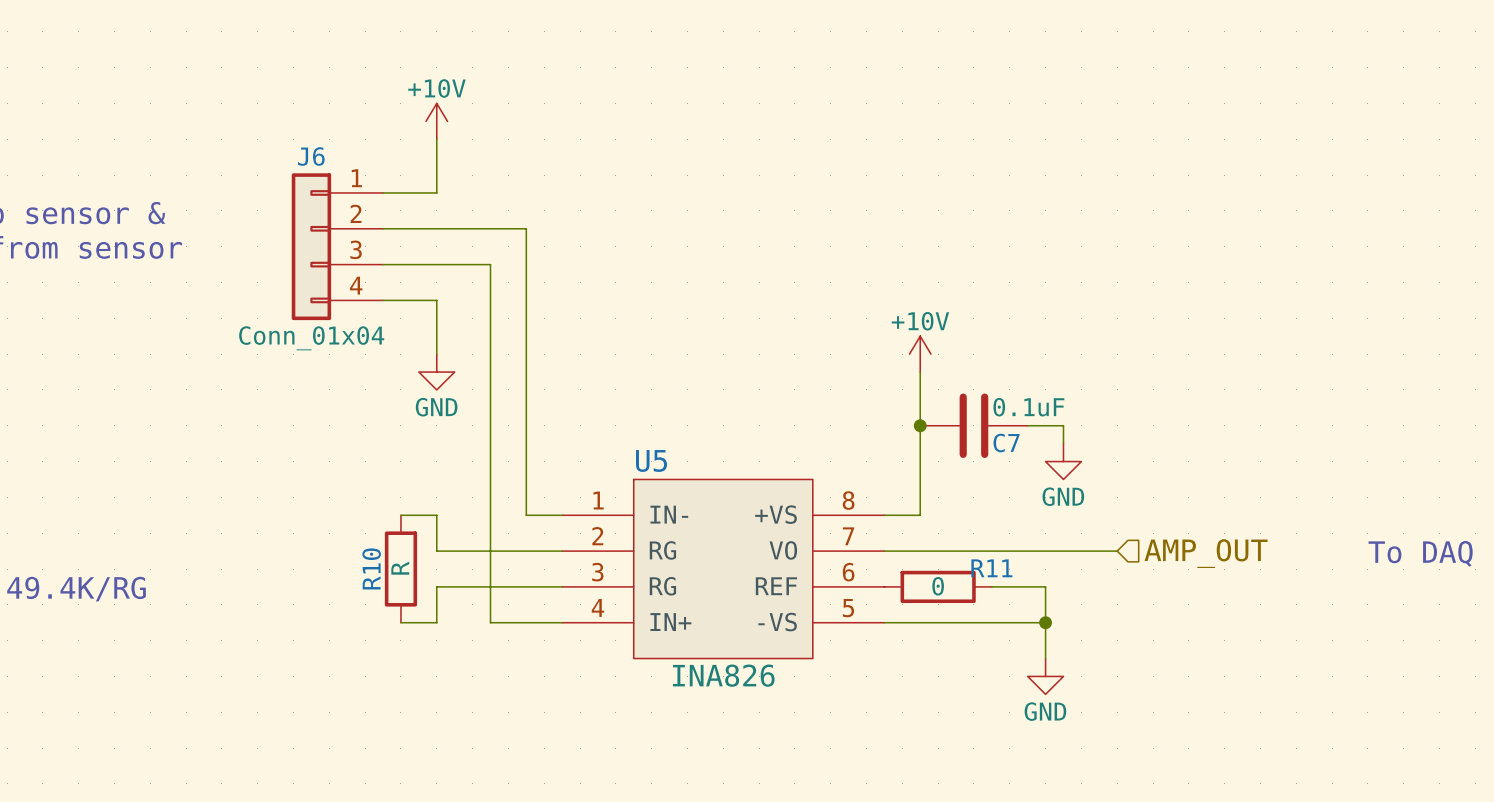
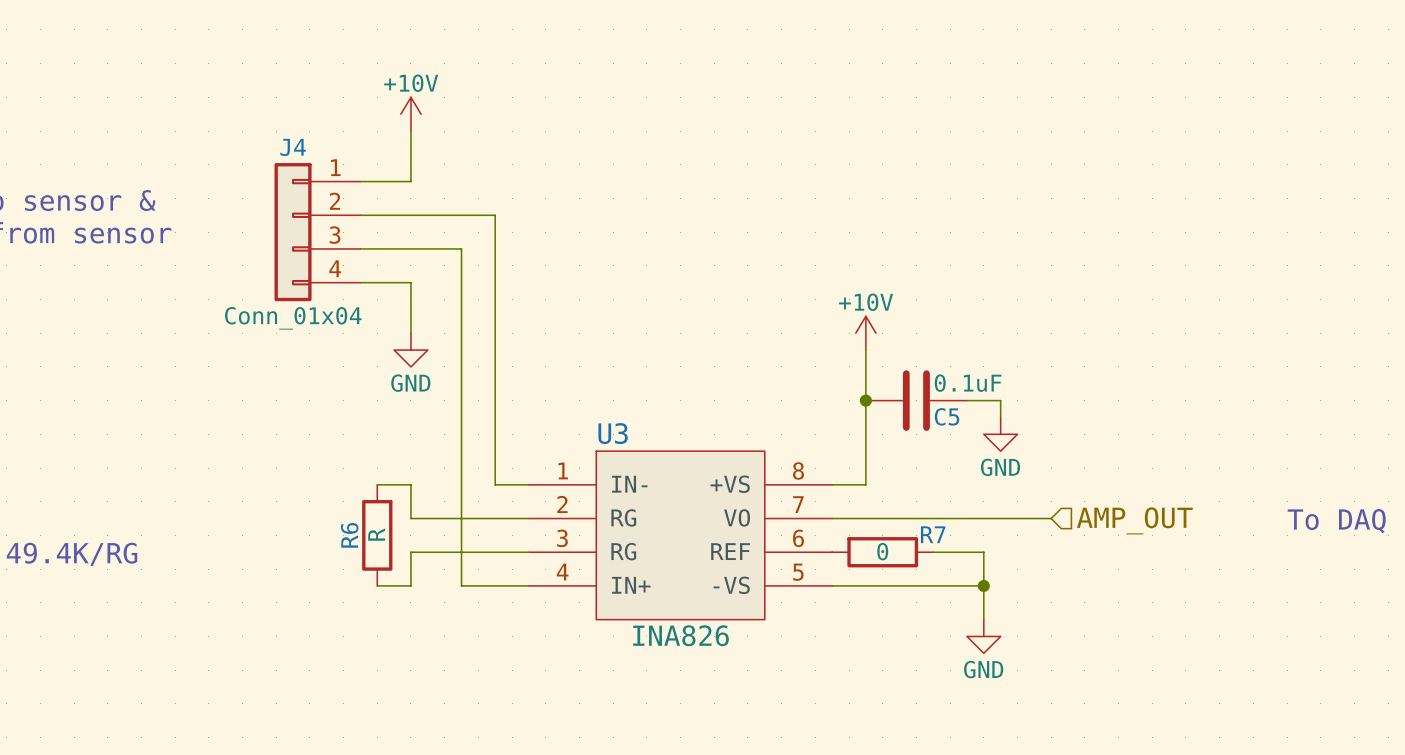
J6 name: J6 (311, 156) -> J4 (293, 147)
C7 name: C7 (1006, 443) -> C5 (947, 416)
U5 name: U5 (651, 460) -> U3 (613, 433)
R10 name: R10 (371, 568) -> R6 (349, 535)
R11 name: R11 (991, 568) -> R7 (933, 534)

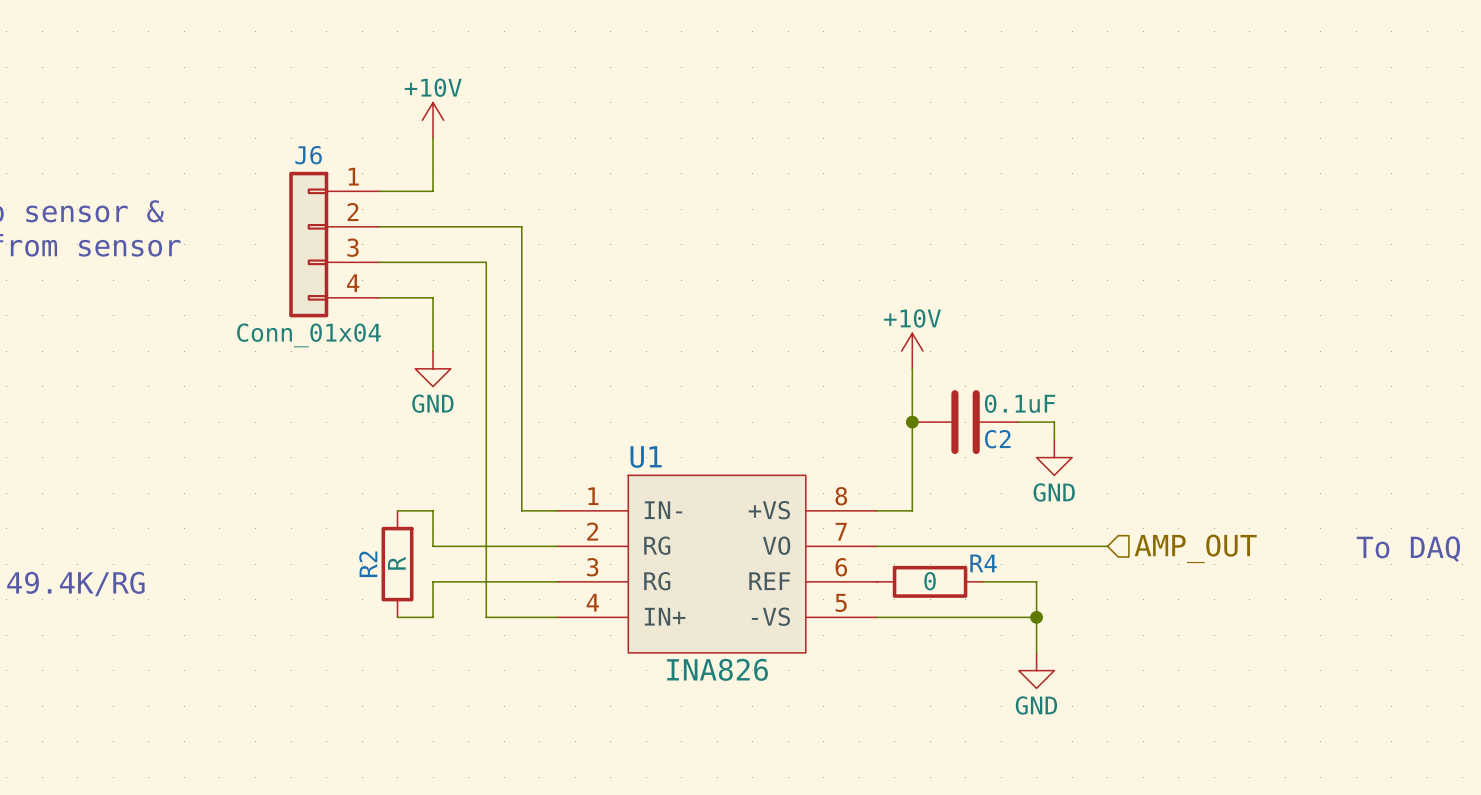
J4 name: J4 (293, 147) -> J6 (308, 155)
C5 name: C5 (947, 416) -> C2 (997, 439)
U3 name: U3 (613, 433) -> U1 (646, 457)
R7 name: R7 (933, 534) -> R4 (983, 563)
R6 name: R6 (349, 535) -> R2 (368, 564)

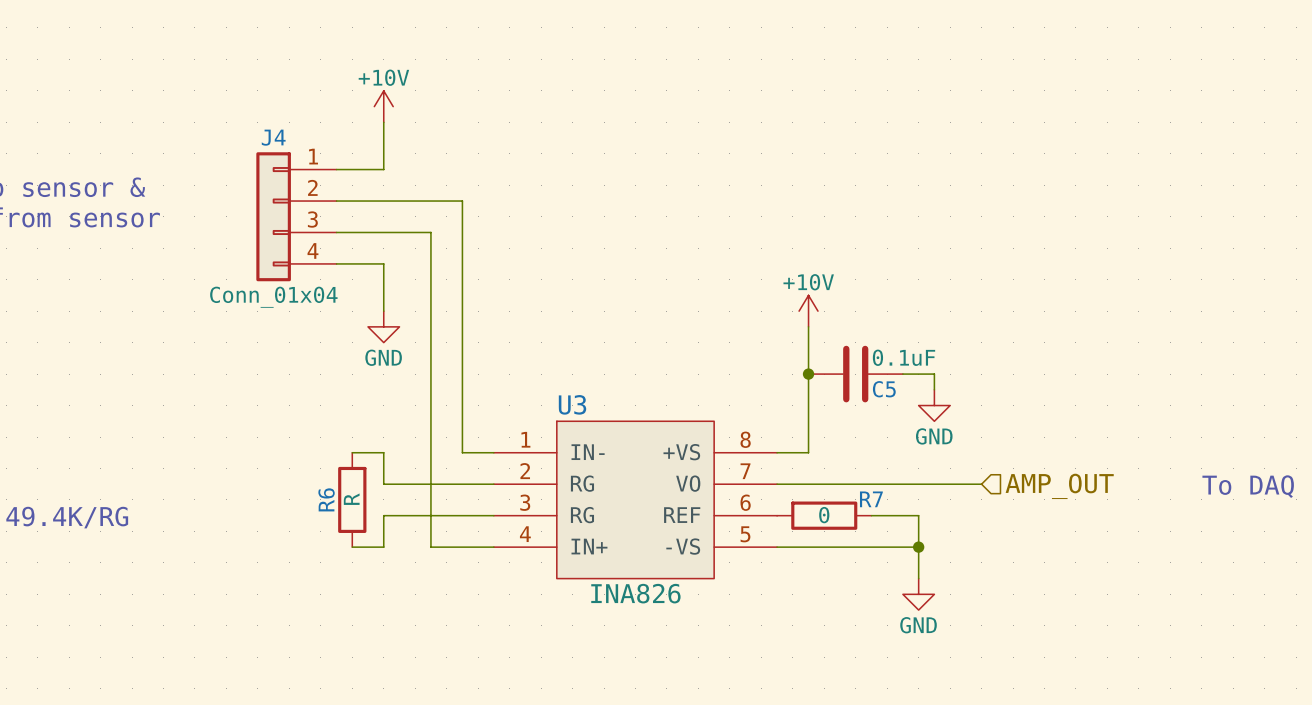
J6 name: J6 (308, 155) -> J4 (273, 137)
C2 name: C2 (997, 439) -> C5 (884, 389)
U1 name: U1 (646, 457) -> U3 (572, 404)
R4 name: R4 (983, 563) -> R7 (871, 499)
R2 name: R2 (368, 564) -> R6 (326, 499)

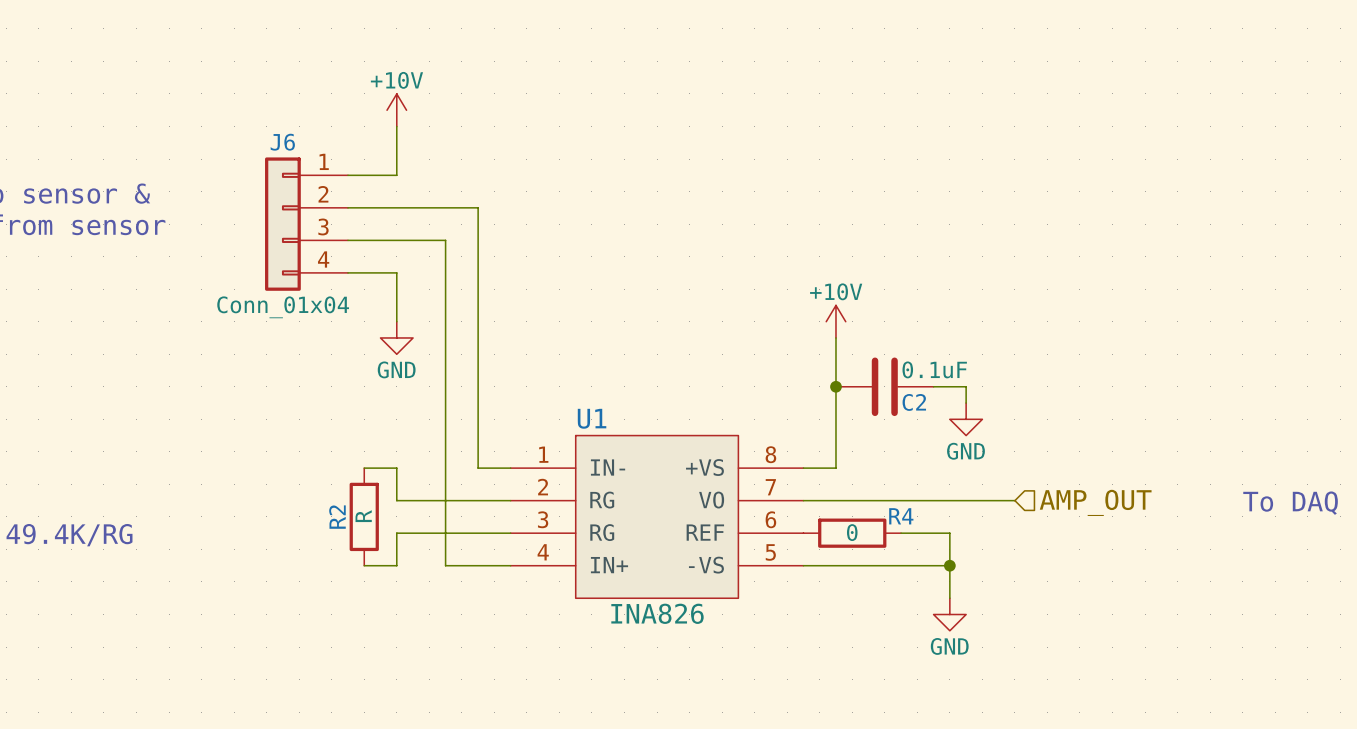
J4 name: J4 (273, 137) -> J6 (282, 142)
C5 name: C5 (884, 389) -> C2 (914, 402)
U3 name: U3 (572, 404) -> U1 (592, 418)
R6 name: R6 (326, 499) -> R2 (337, 517)
R7 name: R7 (871, 499) -> R4 (901, 516)

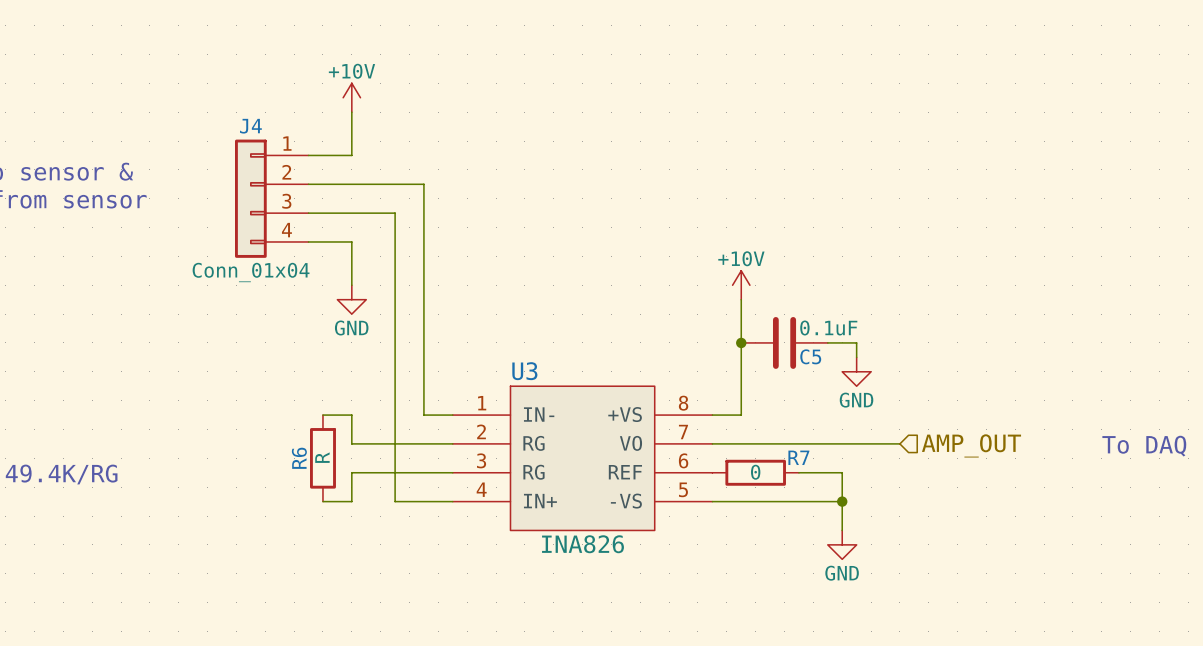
J6 name: J6 (282, 142) -> J4 (250, 126)
C2 name: C2 (914, 402) -> C5 (810, 356)
U1 name: U1 (592, 418) -> U3 (524, 371)
R4 name: R4 (901, 516) -> R7 (798, 457)
R2 name: R2 (337, 517) -> R6 (299, 458)

